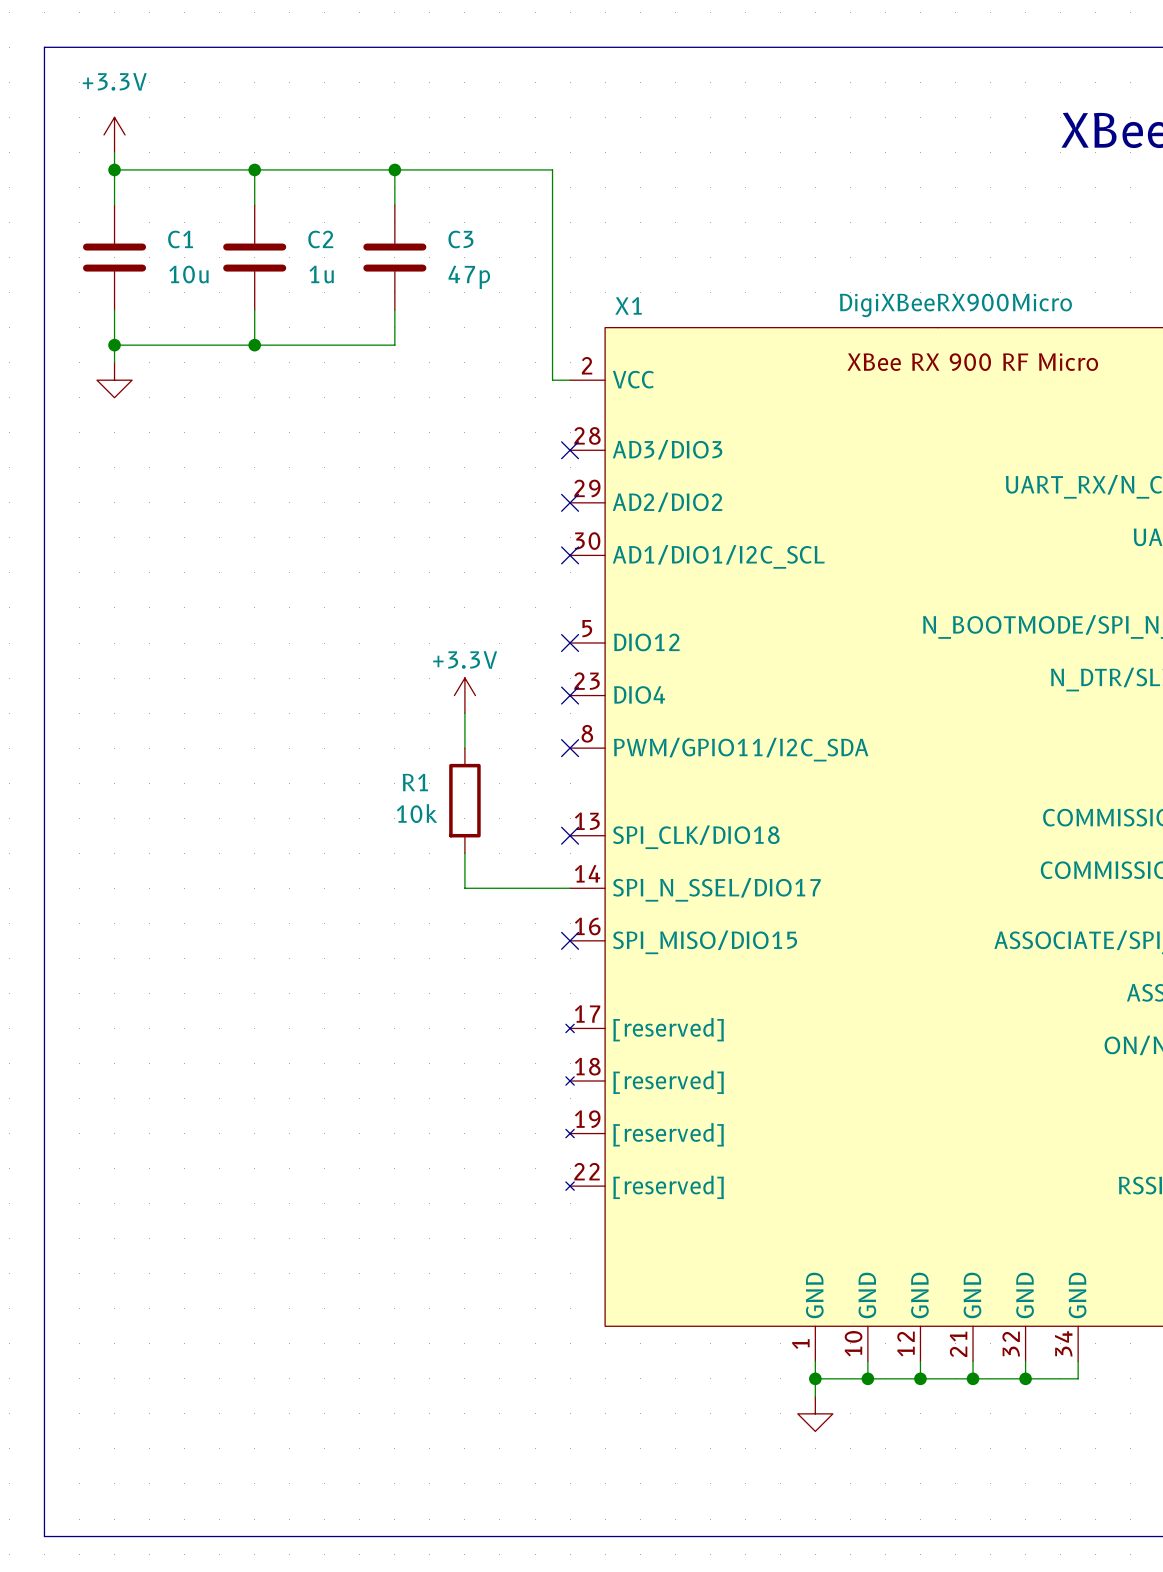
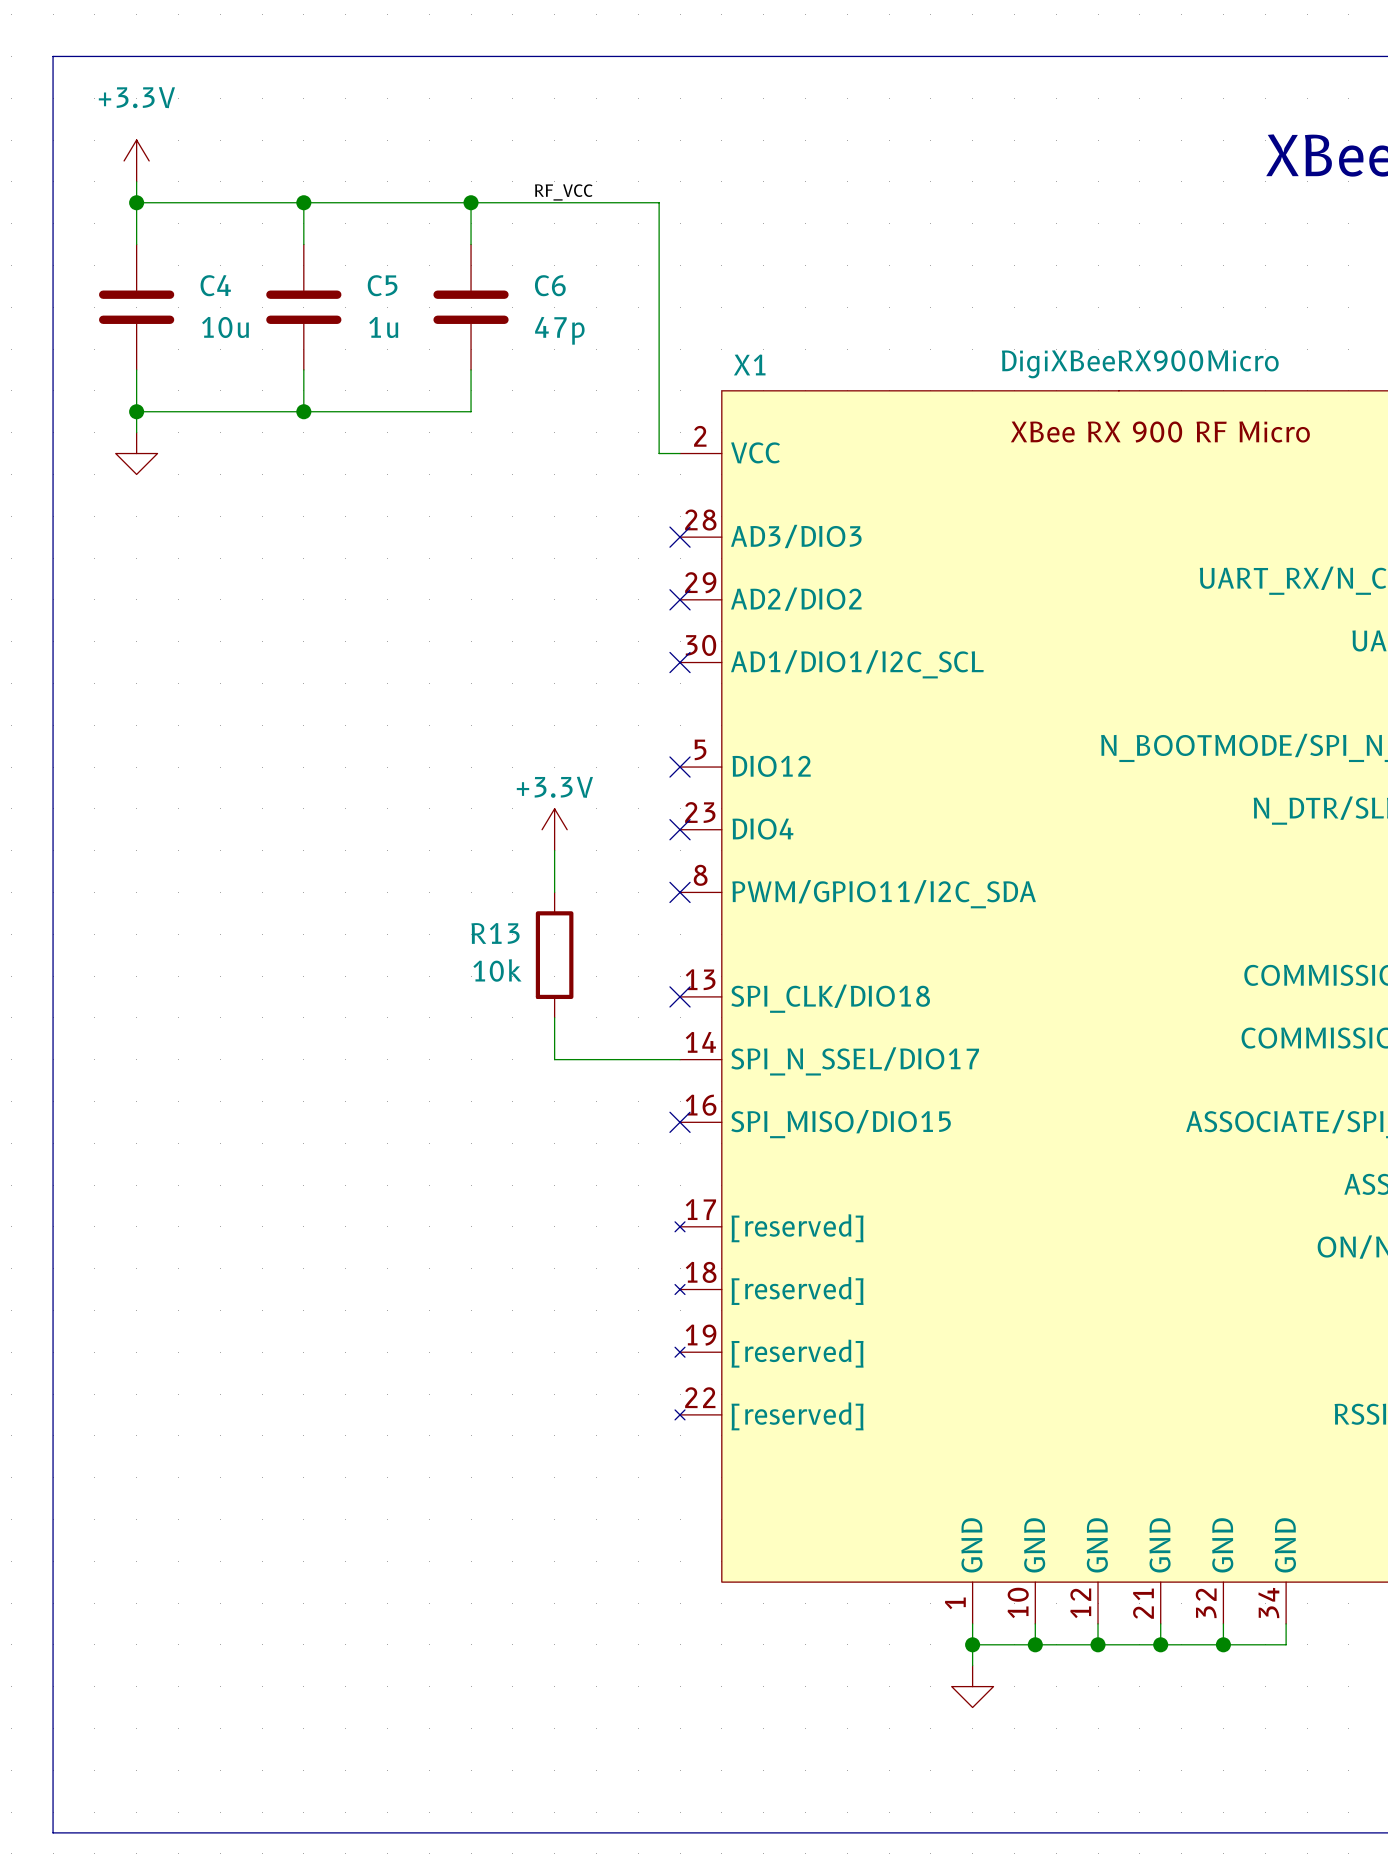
label: none -> RF_VCC (563, 192)
C1 name: C1 (180, 239) -> C4 (215, 285)
C2 name: C2 (320, 239) -> C5 (382, 285)
C3 name: C3 (460, 239) -> C6 (550, 285)
R1 name: R1 (415, 782) -> R13 (495, 933)

